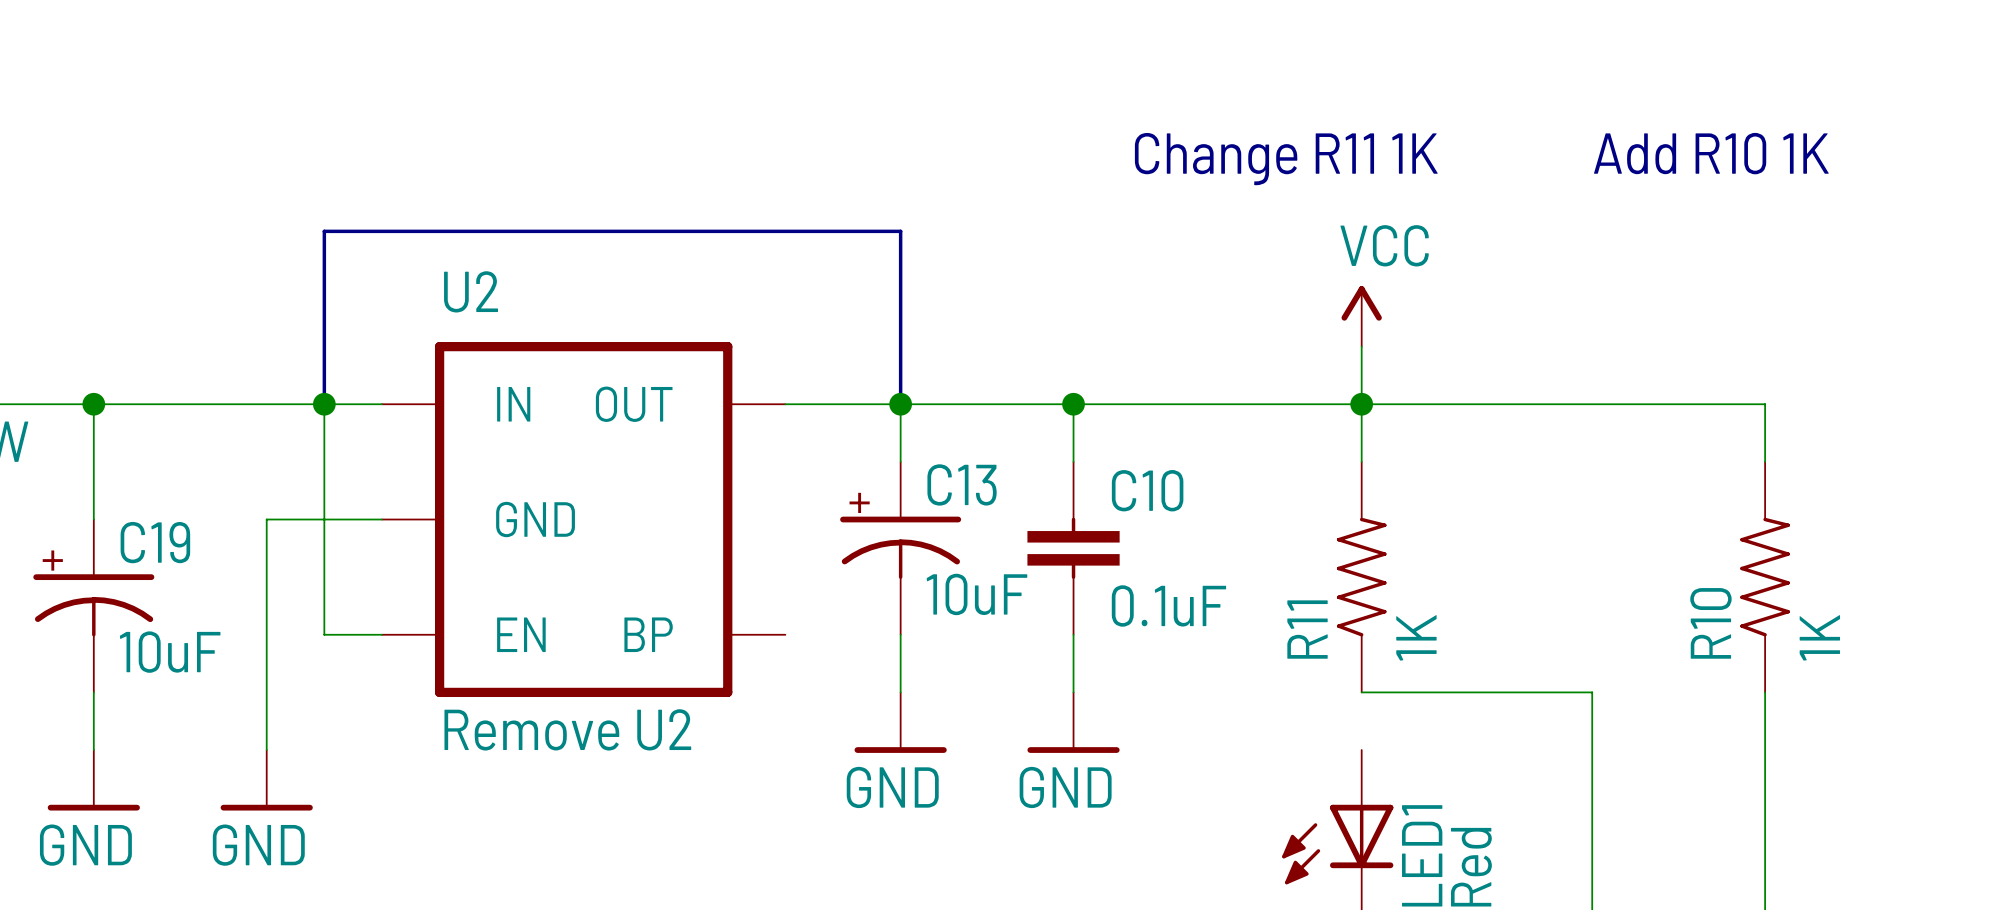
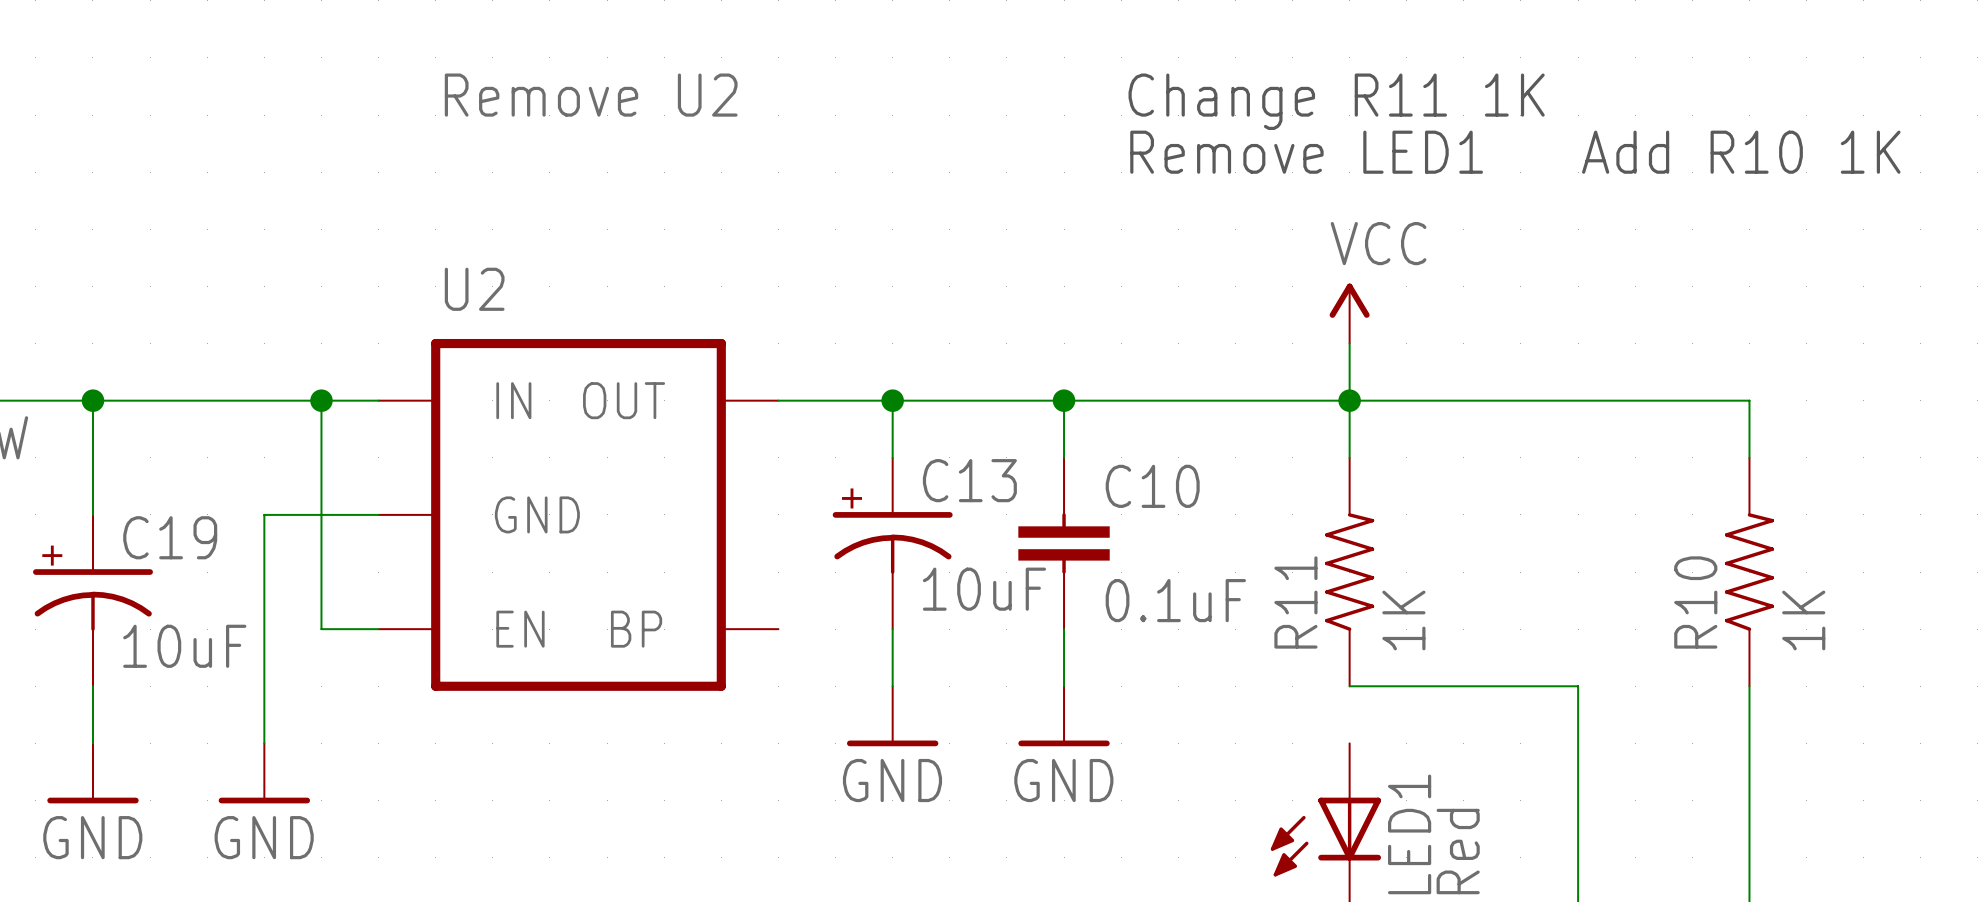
text: none -> Remove U2 (591, 95)
text: none -> Change R11 1K (1336, 101)
text: Change R11 1K (1286, 159) -> Remove LED1 (1306, 152)
line: (324, 404) (324, 231) (900, 231) (900, 404) -> none
text: Remove U2 (567, 729) -> none

